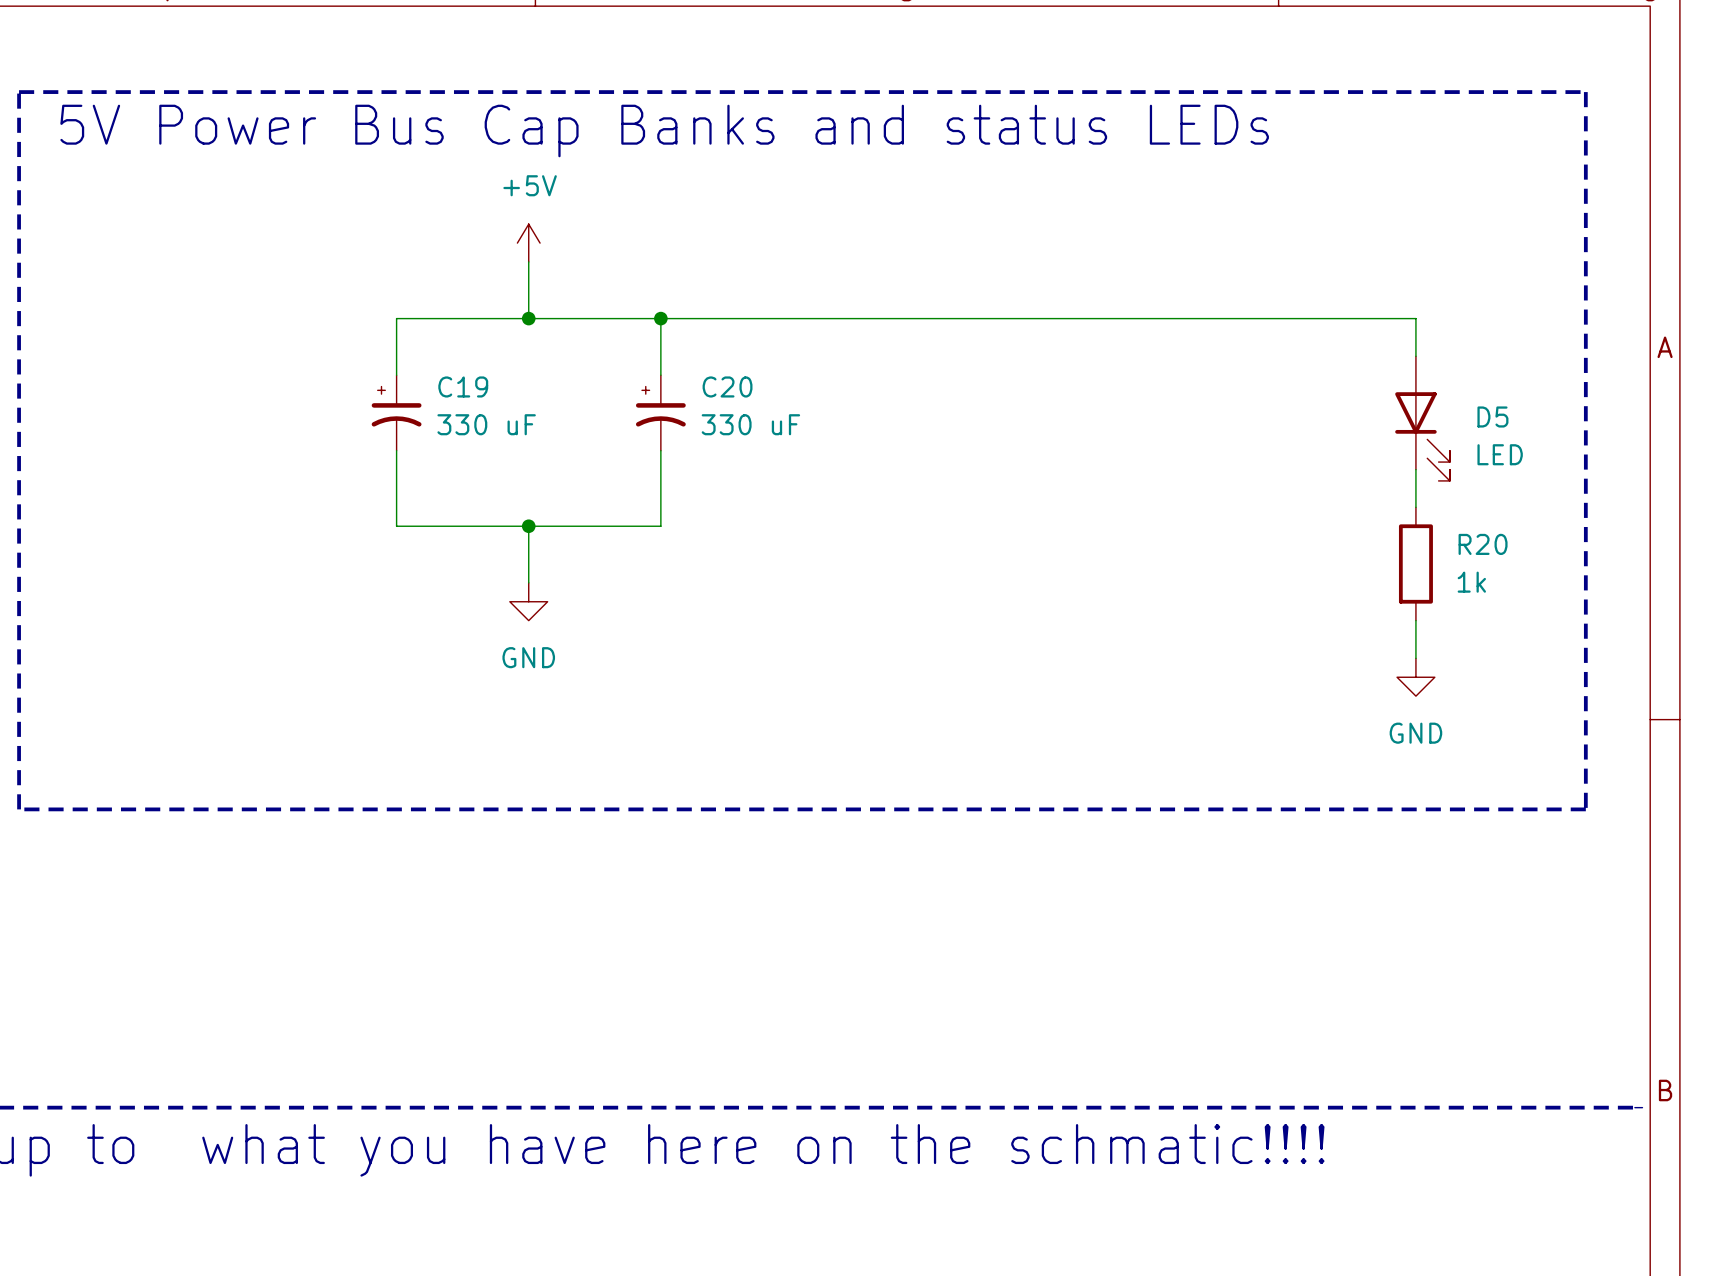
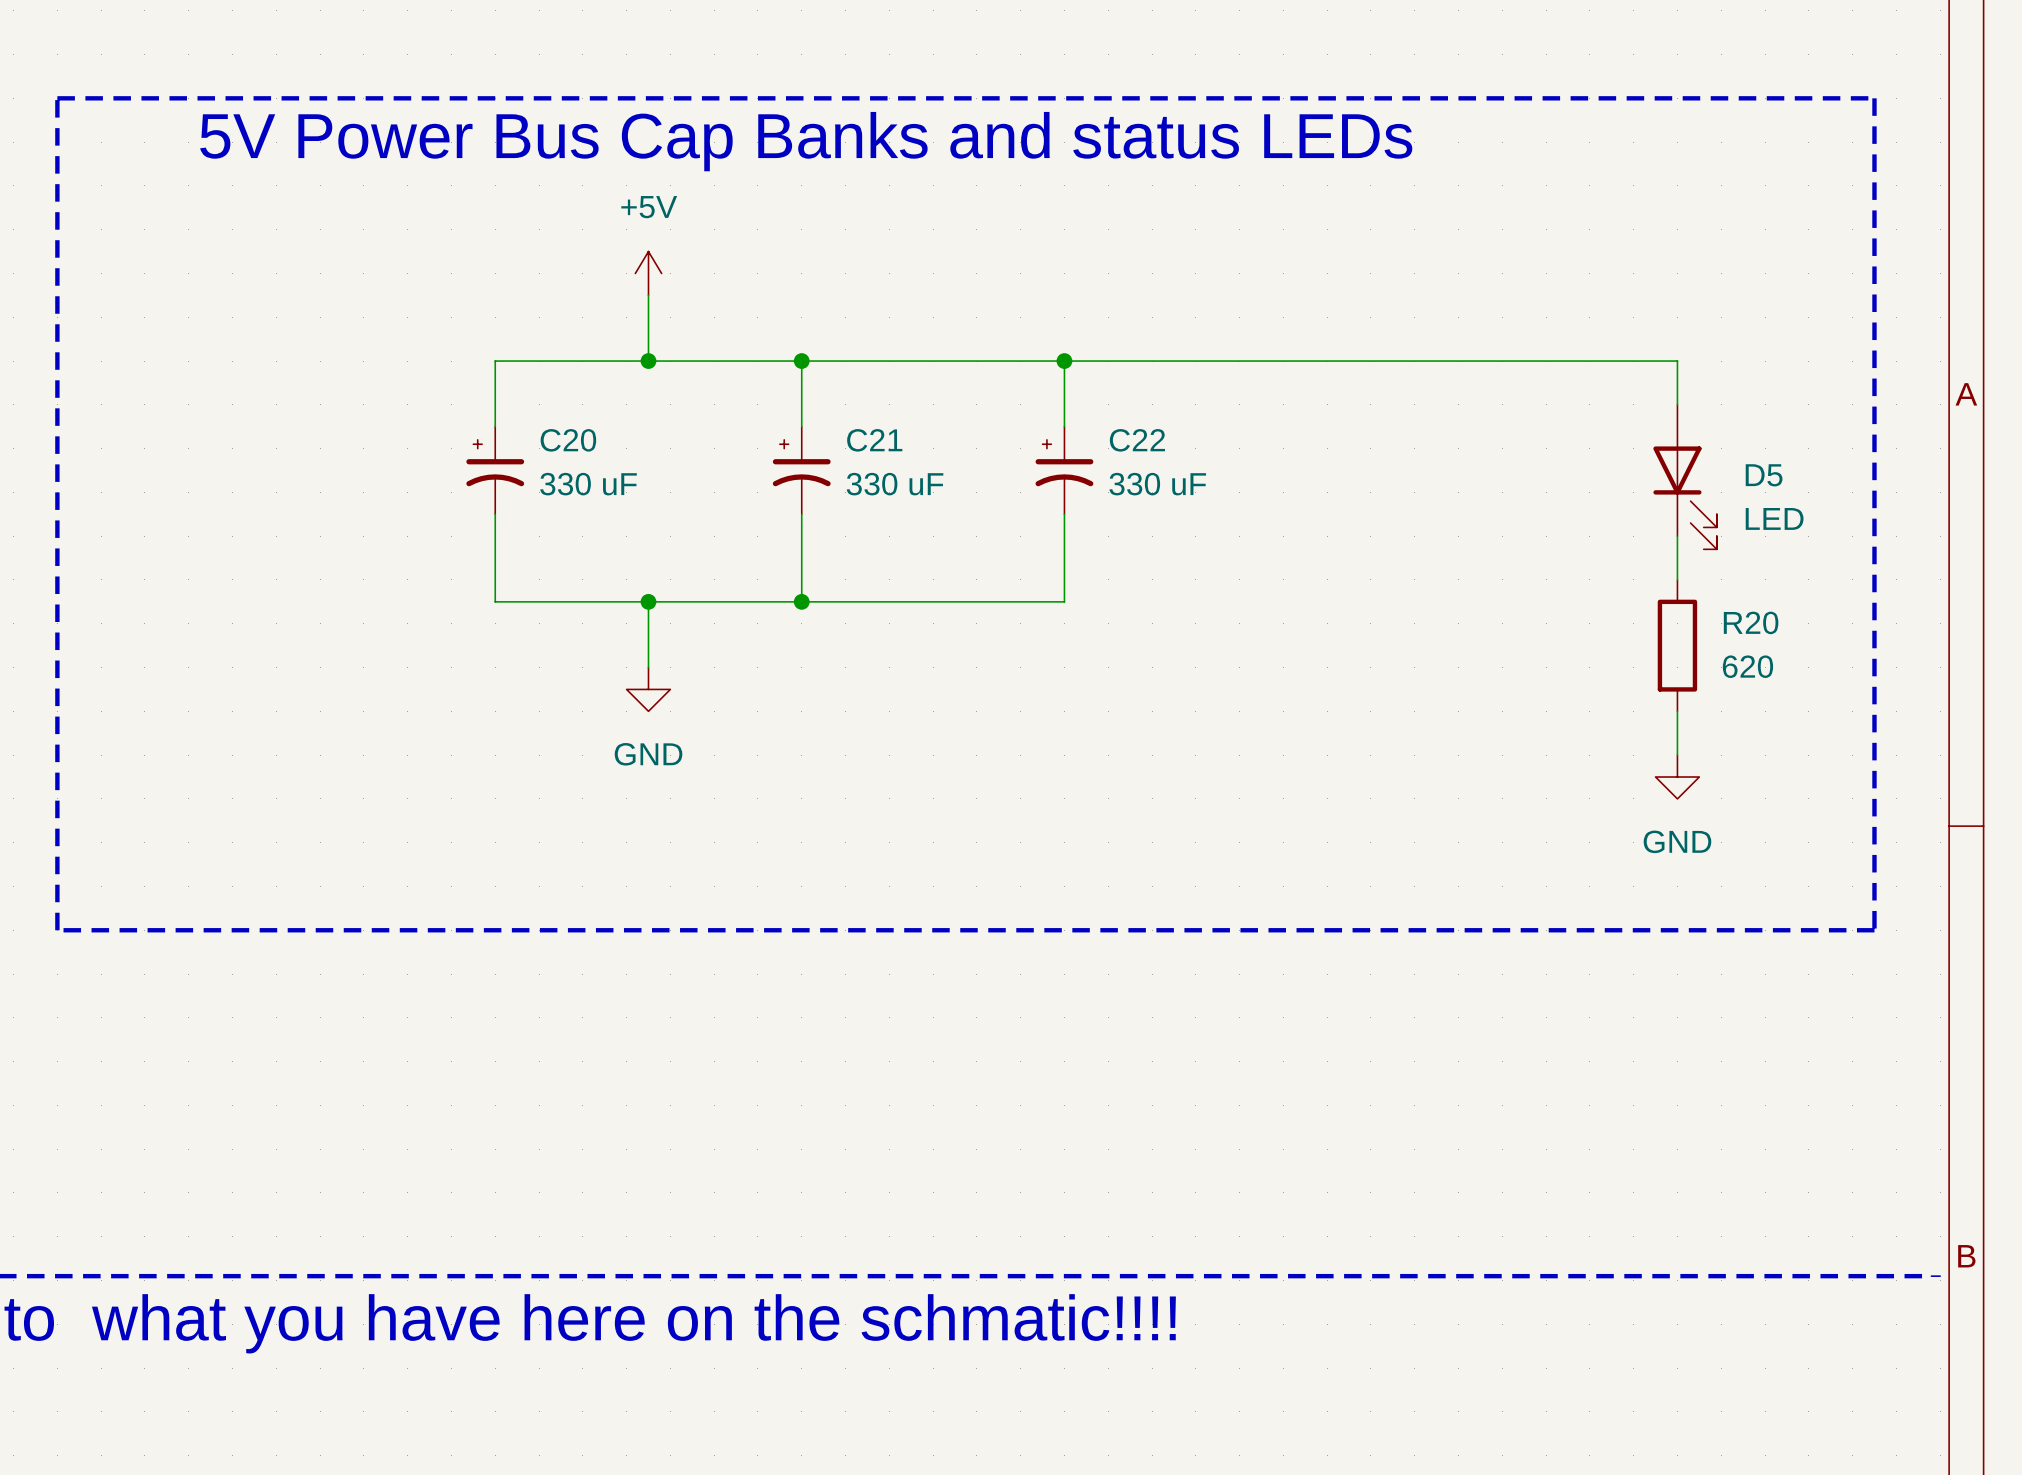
wire: none -> (1064, 361) (1064, 426)
junction: none -> (1064, 361)
C19 name: C19 (463, 386) -> C20 (568, 440)
C20 name: C20 (727, 386) -> C21 (874, 440)
C22: none -> 330 uF (1064, 470)
wire: none -> (1064, 514) (1064, 601) (801, 601)
junction: none -> (801, 601)
R20 value: 1k (1471, 582) -> 620 (1747, 666)

